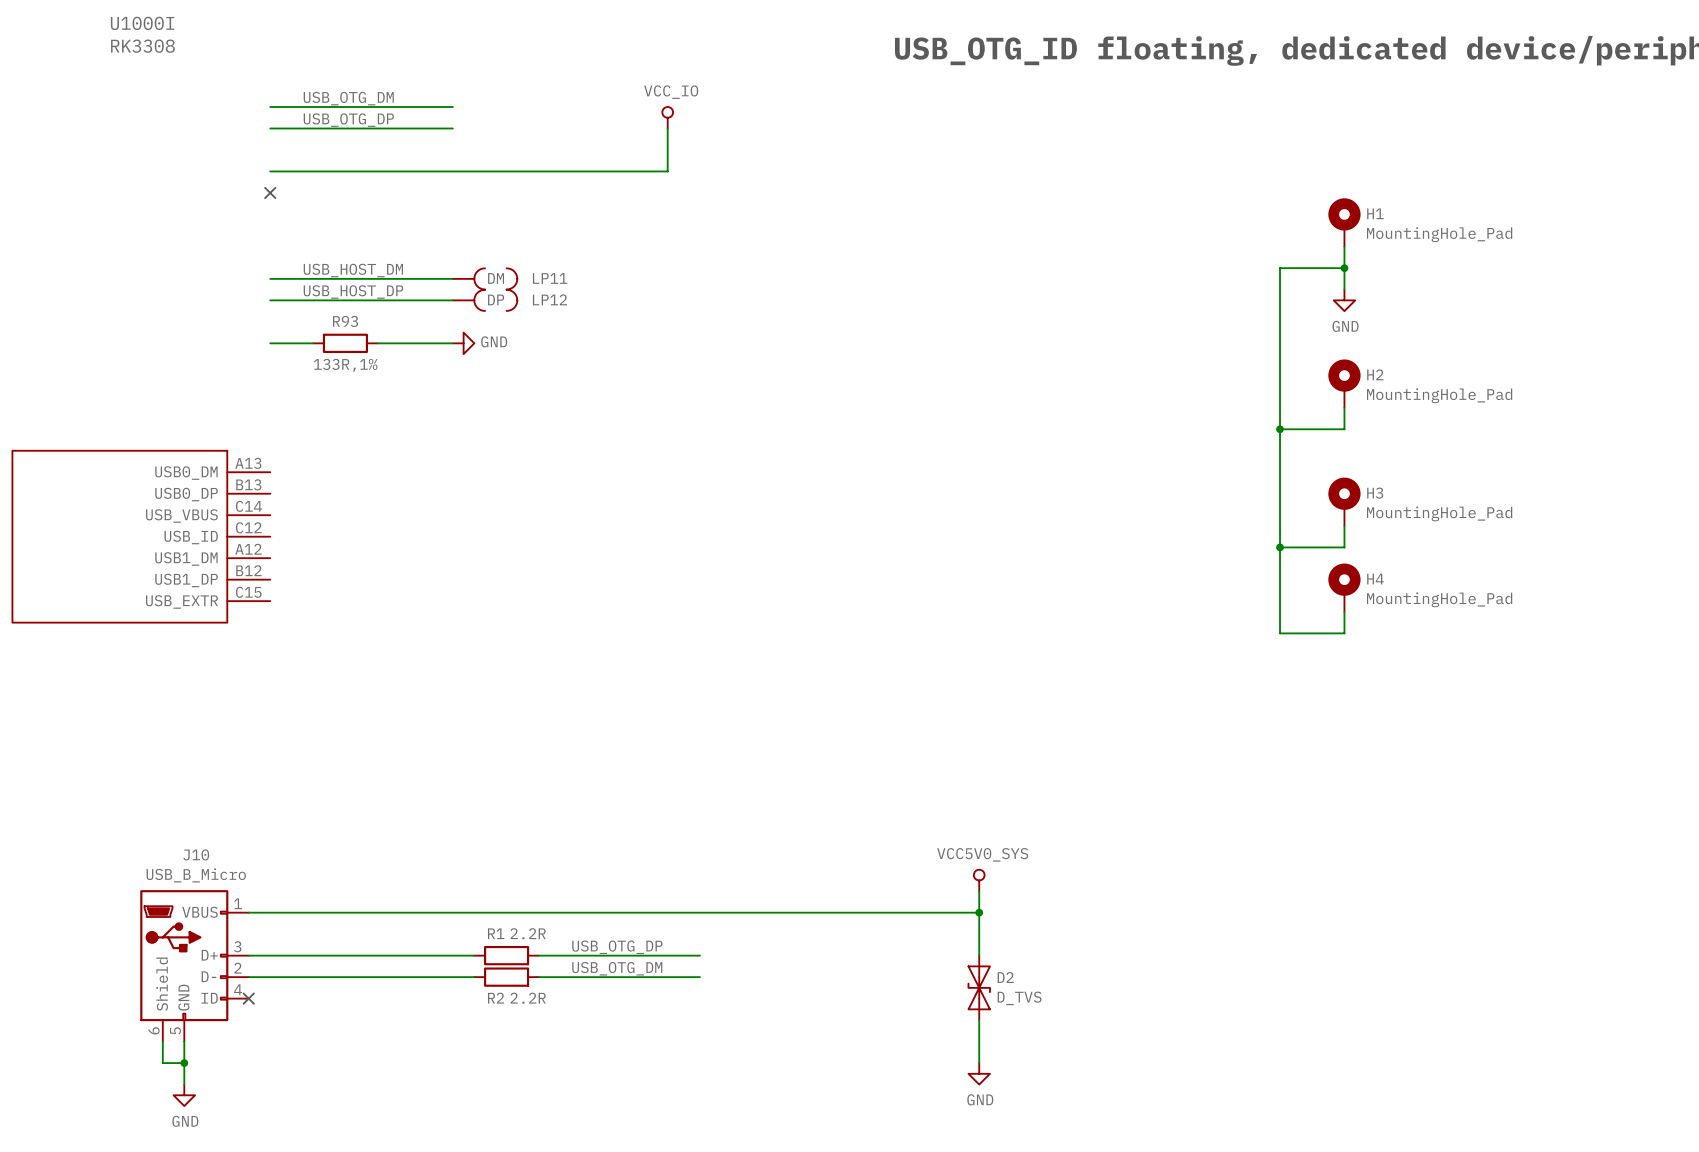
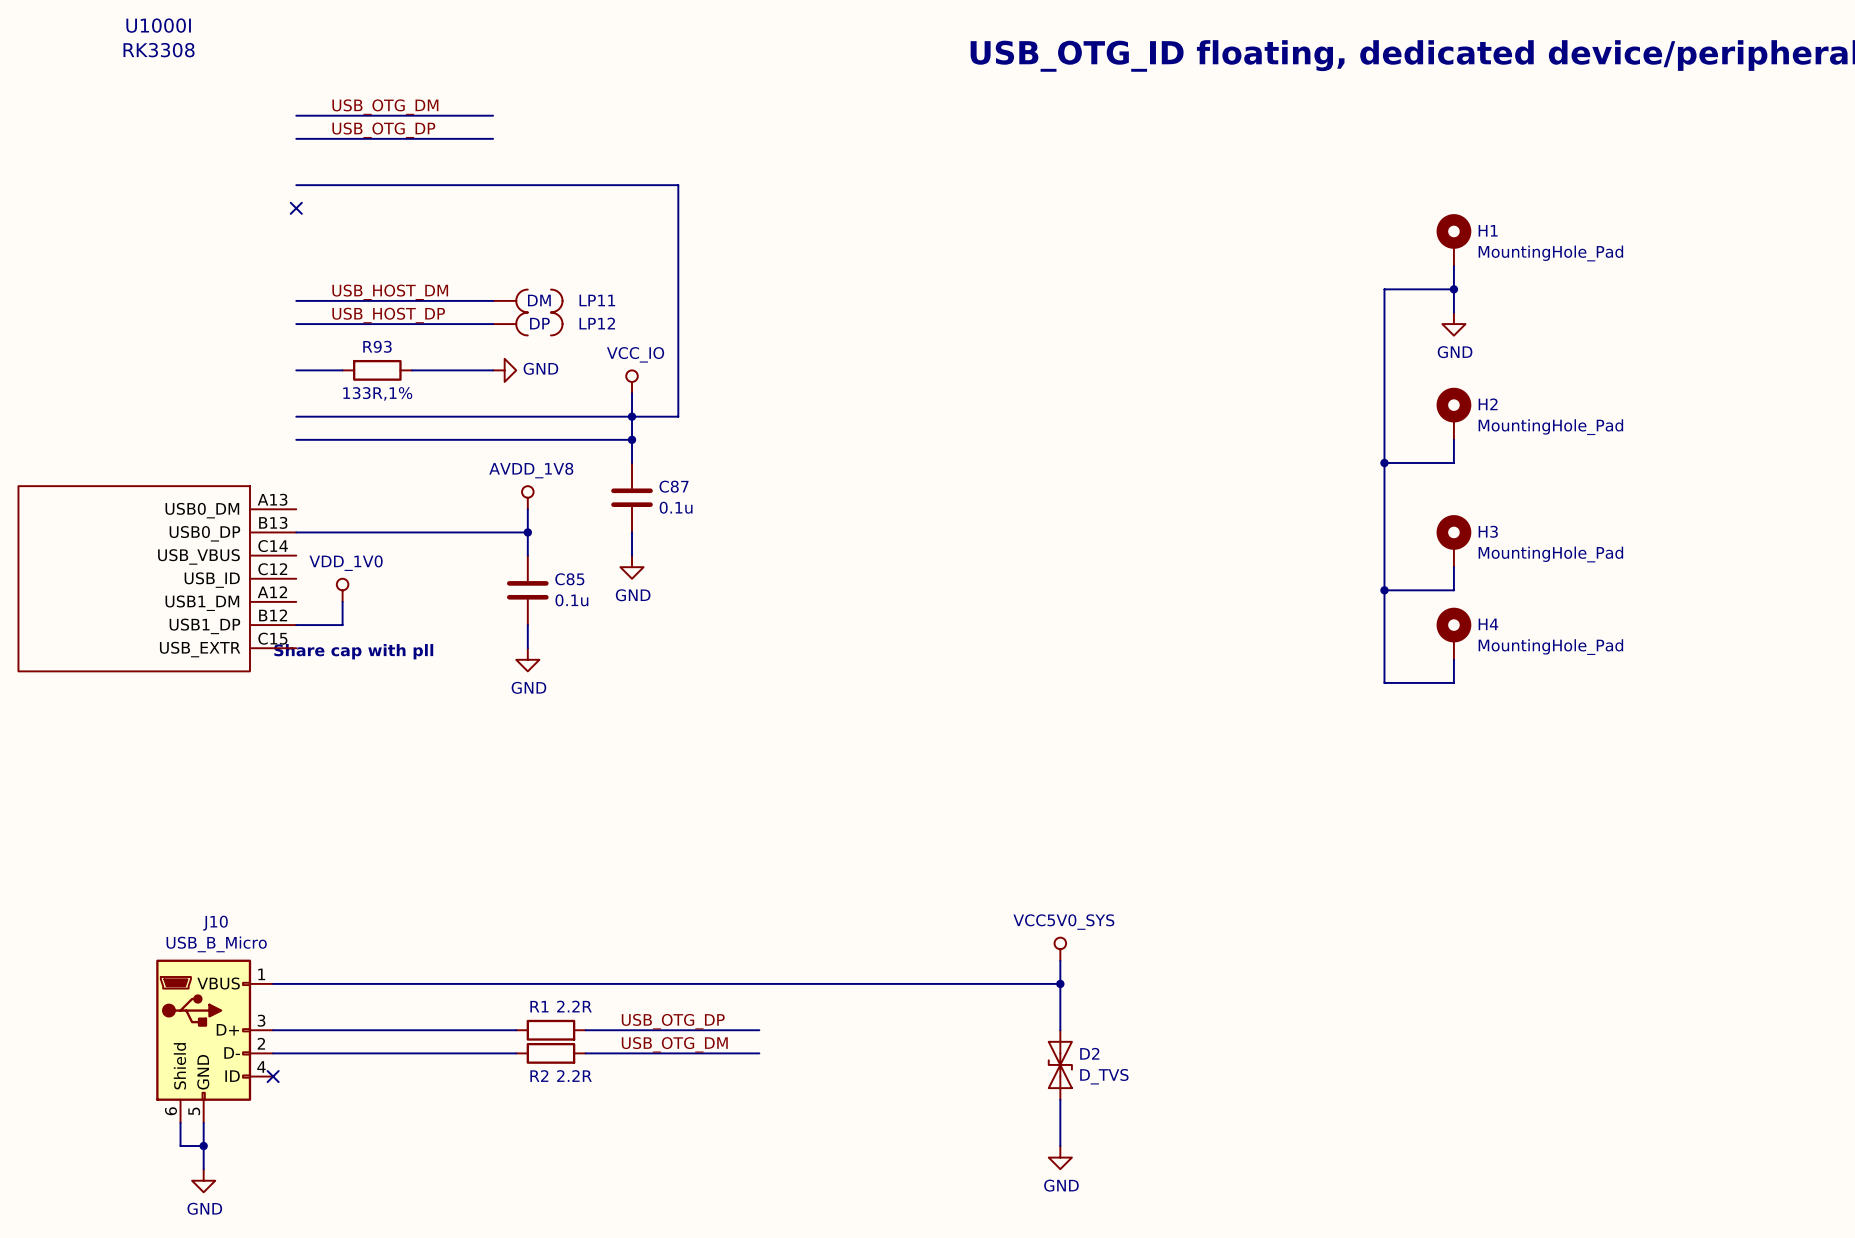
power symbol: VCC_IO (667, 117) -> none
wire: (667, 128) (667, 171) (624, 171) -> (296, 416) (678, 416) (678, 185)
power symbol: none -> VCC_IO (632, 381)
wire: none -> (632, 393) (632, 462)
junction: none -> (632, 416)
wire: none -> (296, 439) (632, 439)
junction: none -> (632, 439)
power symbol: none -> AVDD_1V8 (527, 497)
C87: none -> 0.1u (632, 497)
wire: none -> (527, 509) (527, 555)
wire: none -> (296, 532) (527, 532)
junction: none -> (527, 532)
wire: none -> (632, 532) (632, 555)
power symbol: none -> GND (632, 567)
power symbol: none -> VDD_1V0 (342, 590)
C85: none -> 0.1u (527, 590)
wire: none -> (342, 601) (342, 625) (296, 625)
wire: none -> (527, 625) (527, 648)
text: none -> Share cap with pll (353, 651)
power symbol: none -> GND (527, 659)

